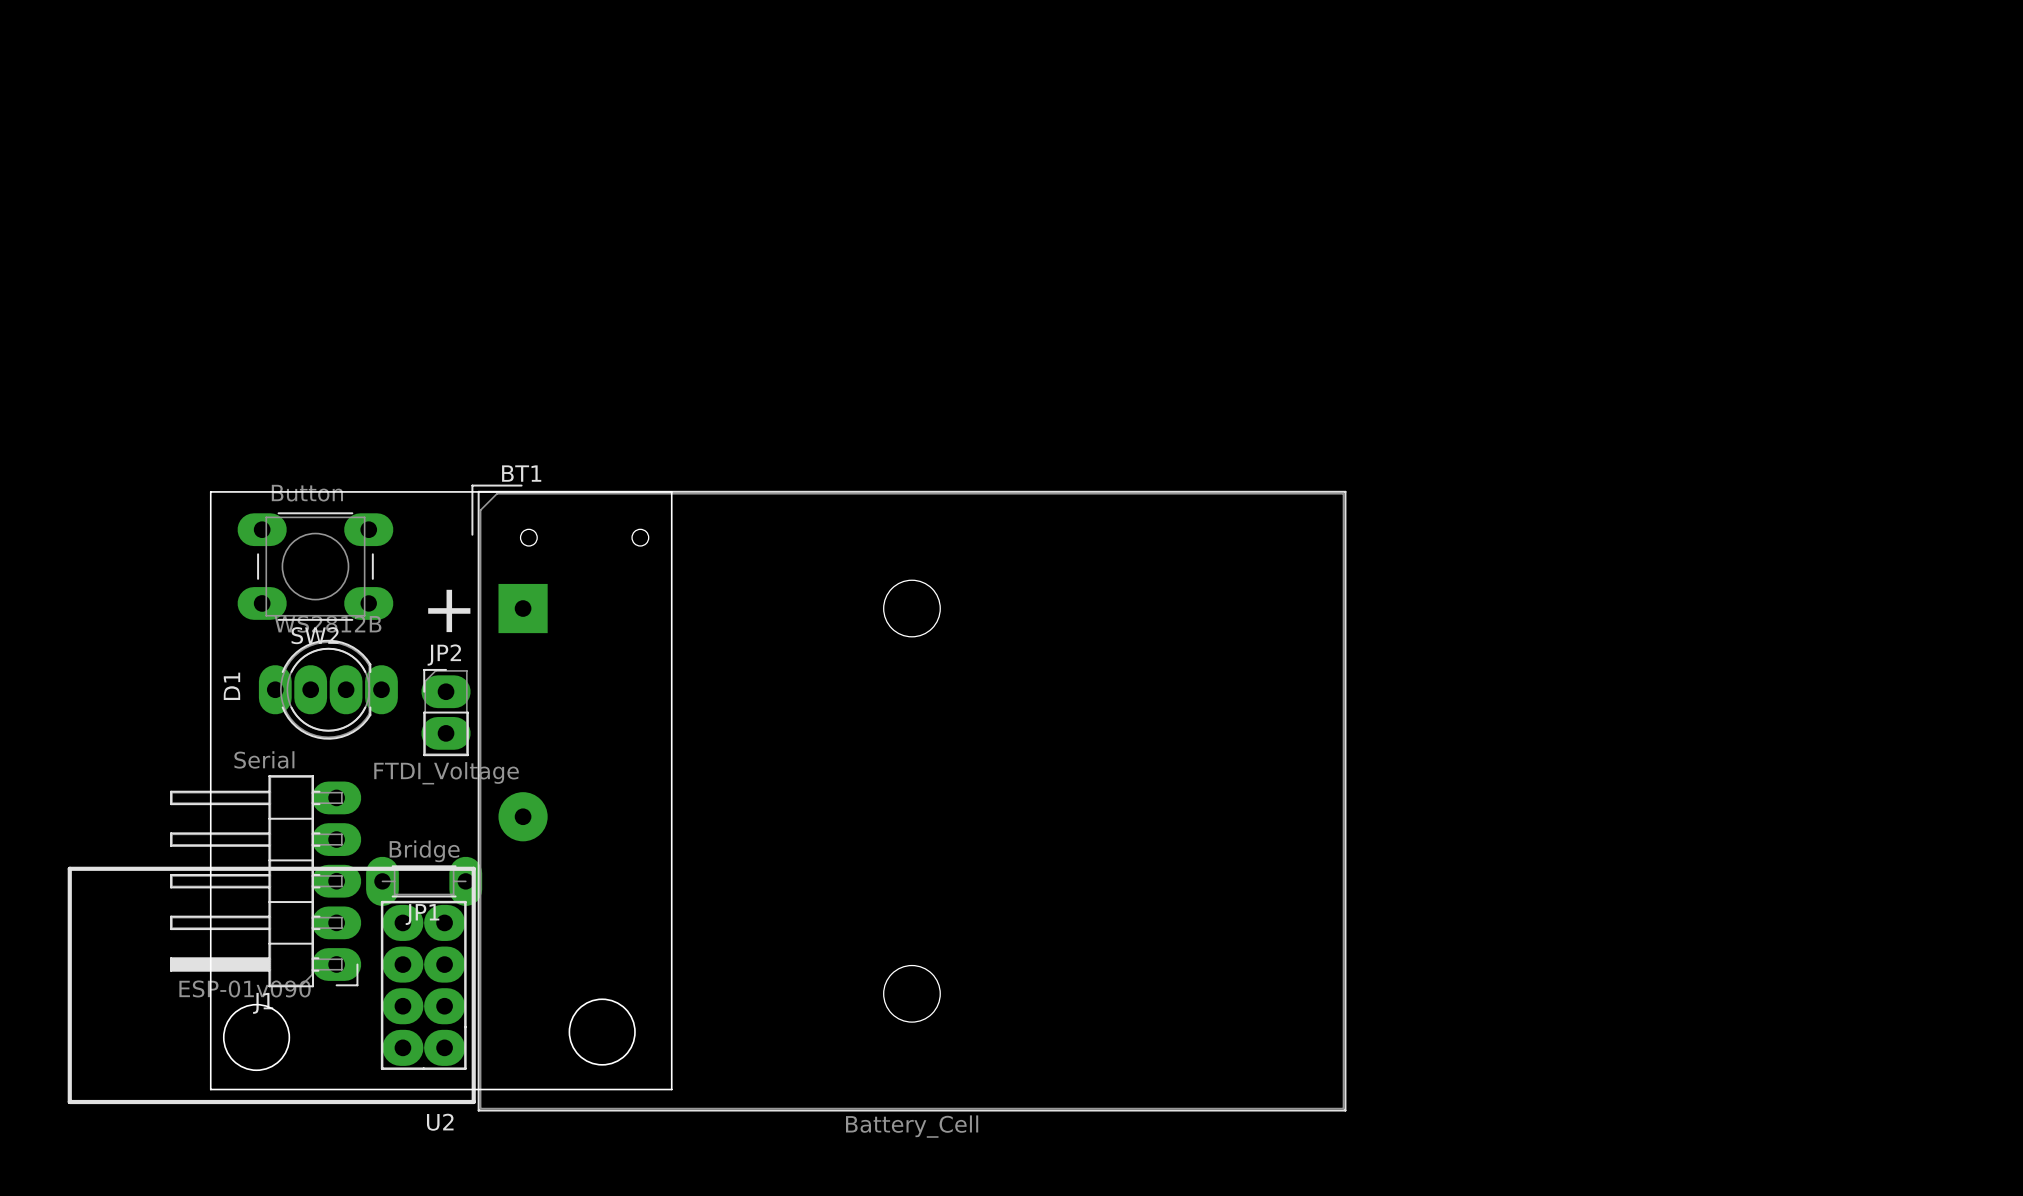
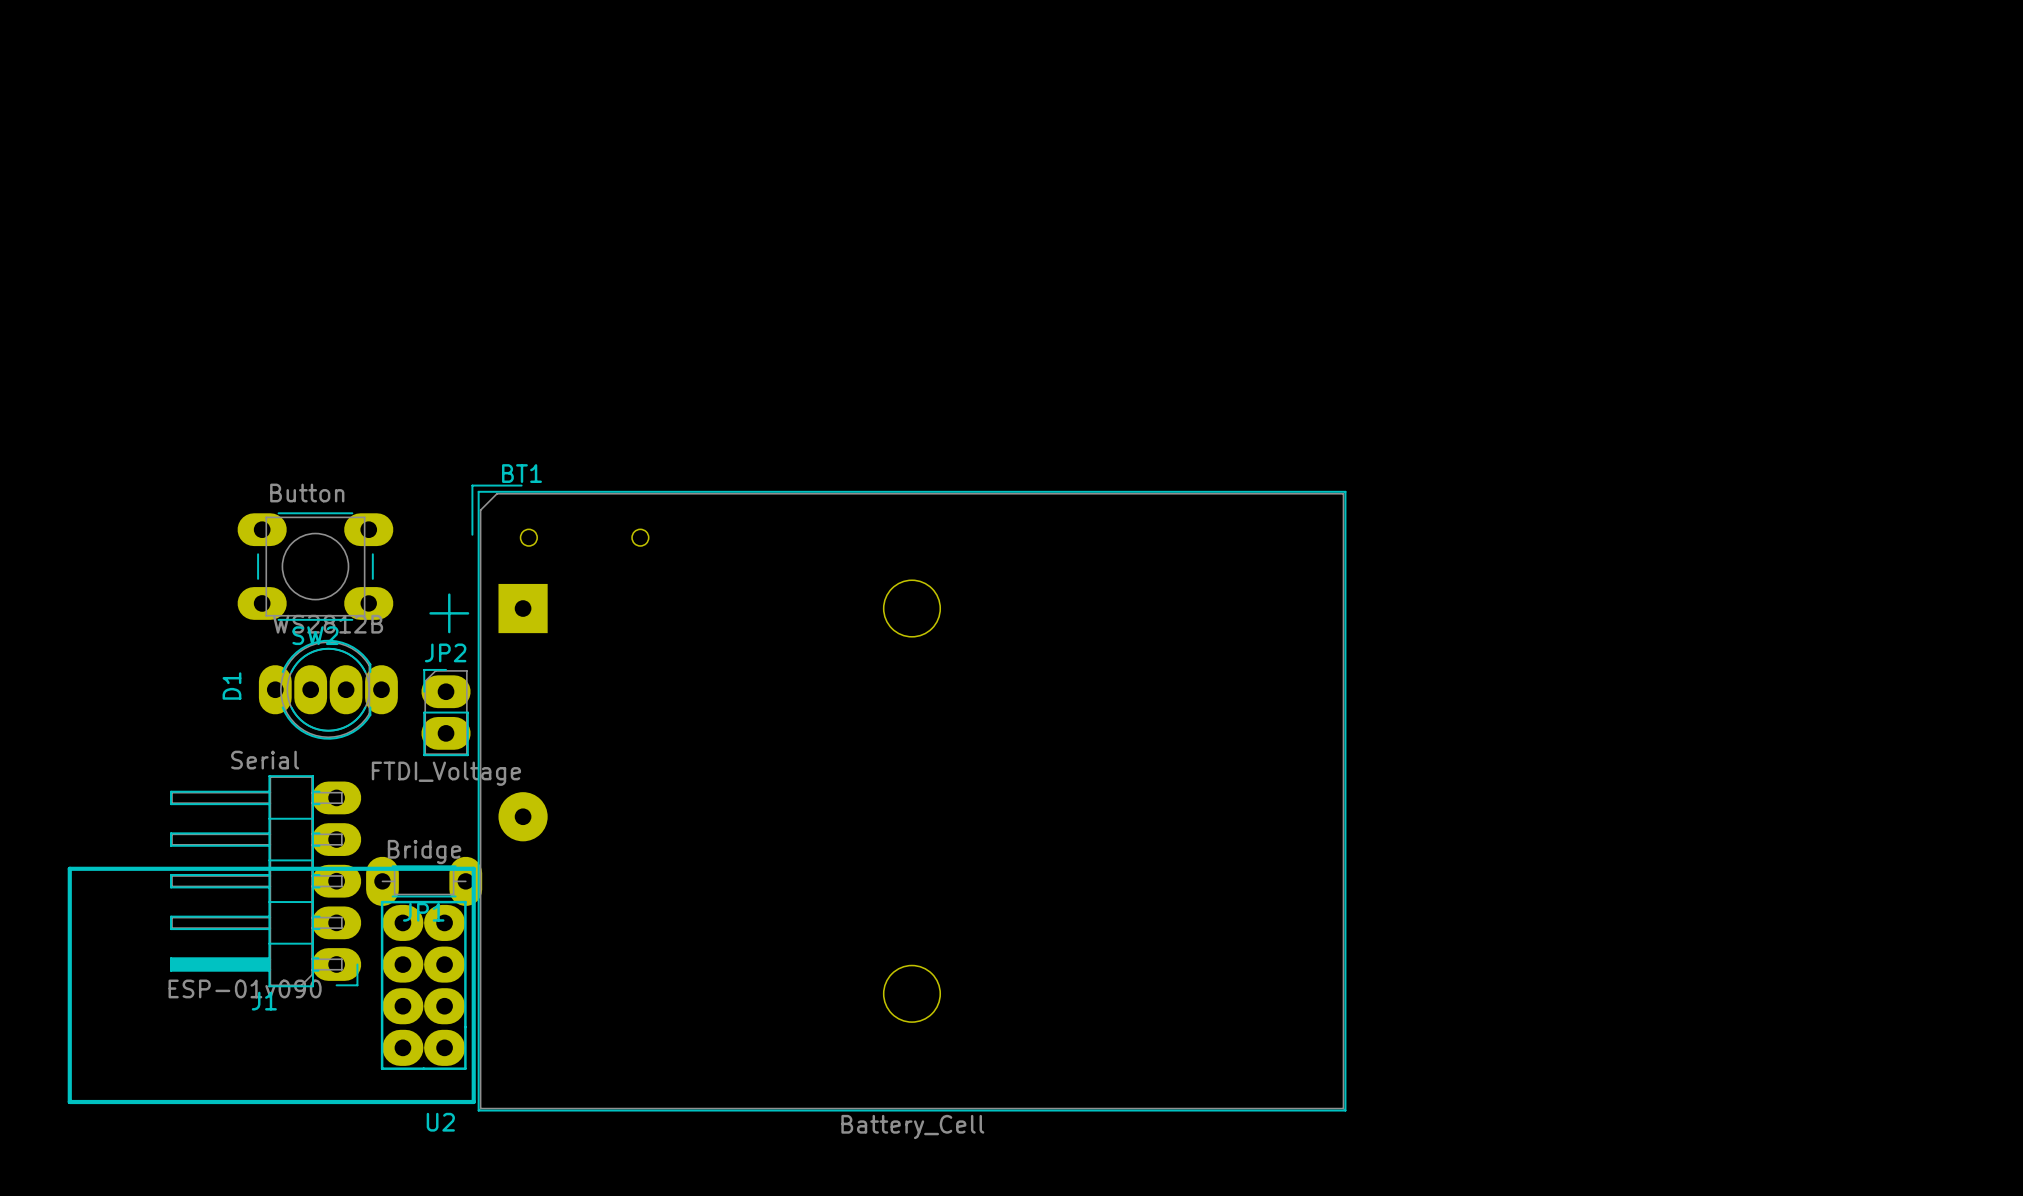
board edge: (210, 491) (671, 491) (671, 1089) (210, 1089) (210, 491) -> none
round board edge: [568, 998, 636, 1066] -> none
round board edge: [222, 1003, 291, 1072] -> none

